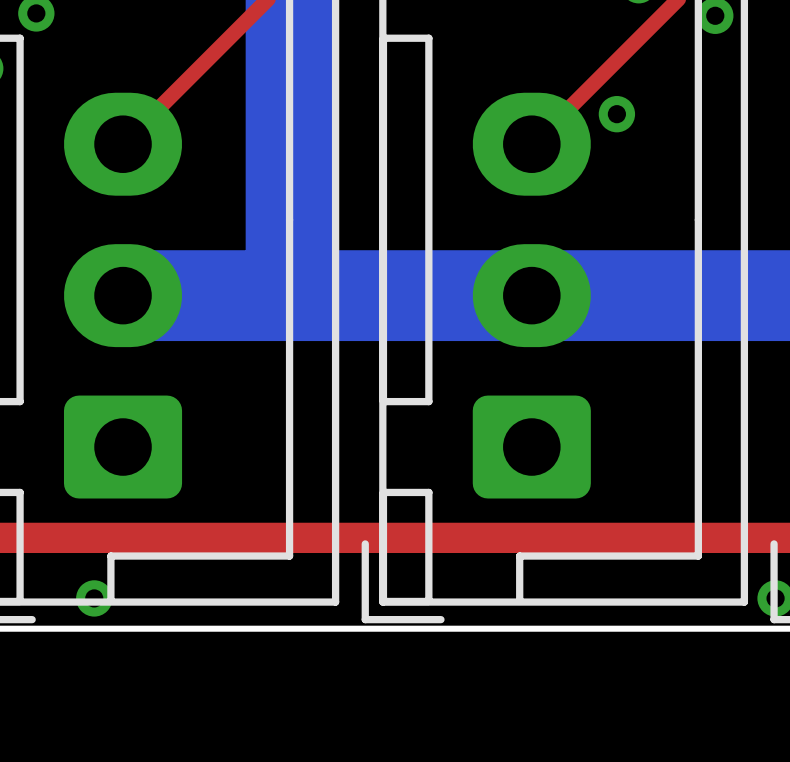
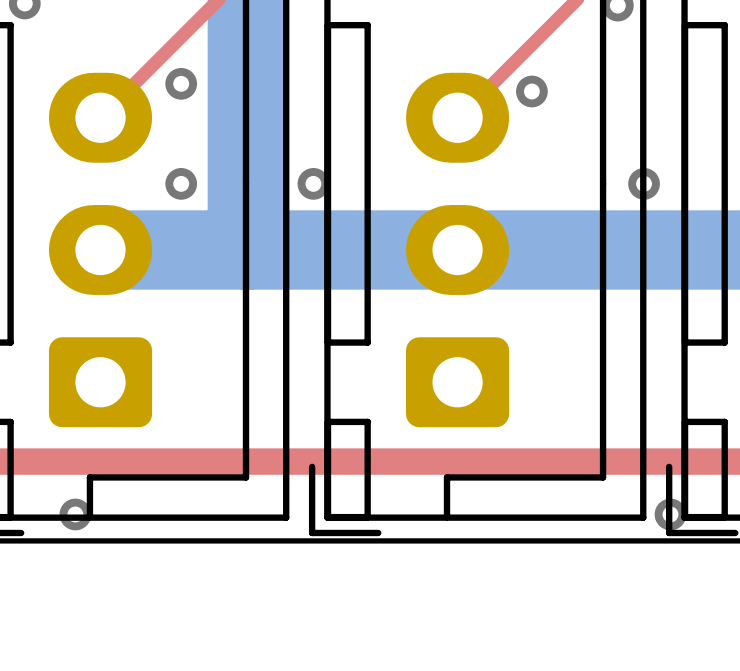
via: none -> (181, 83)
via: none -> (181, 183)
via: none -> (313, 183)
via: none -> (644, 183)

